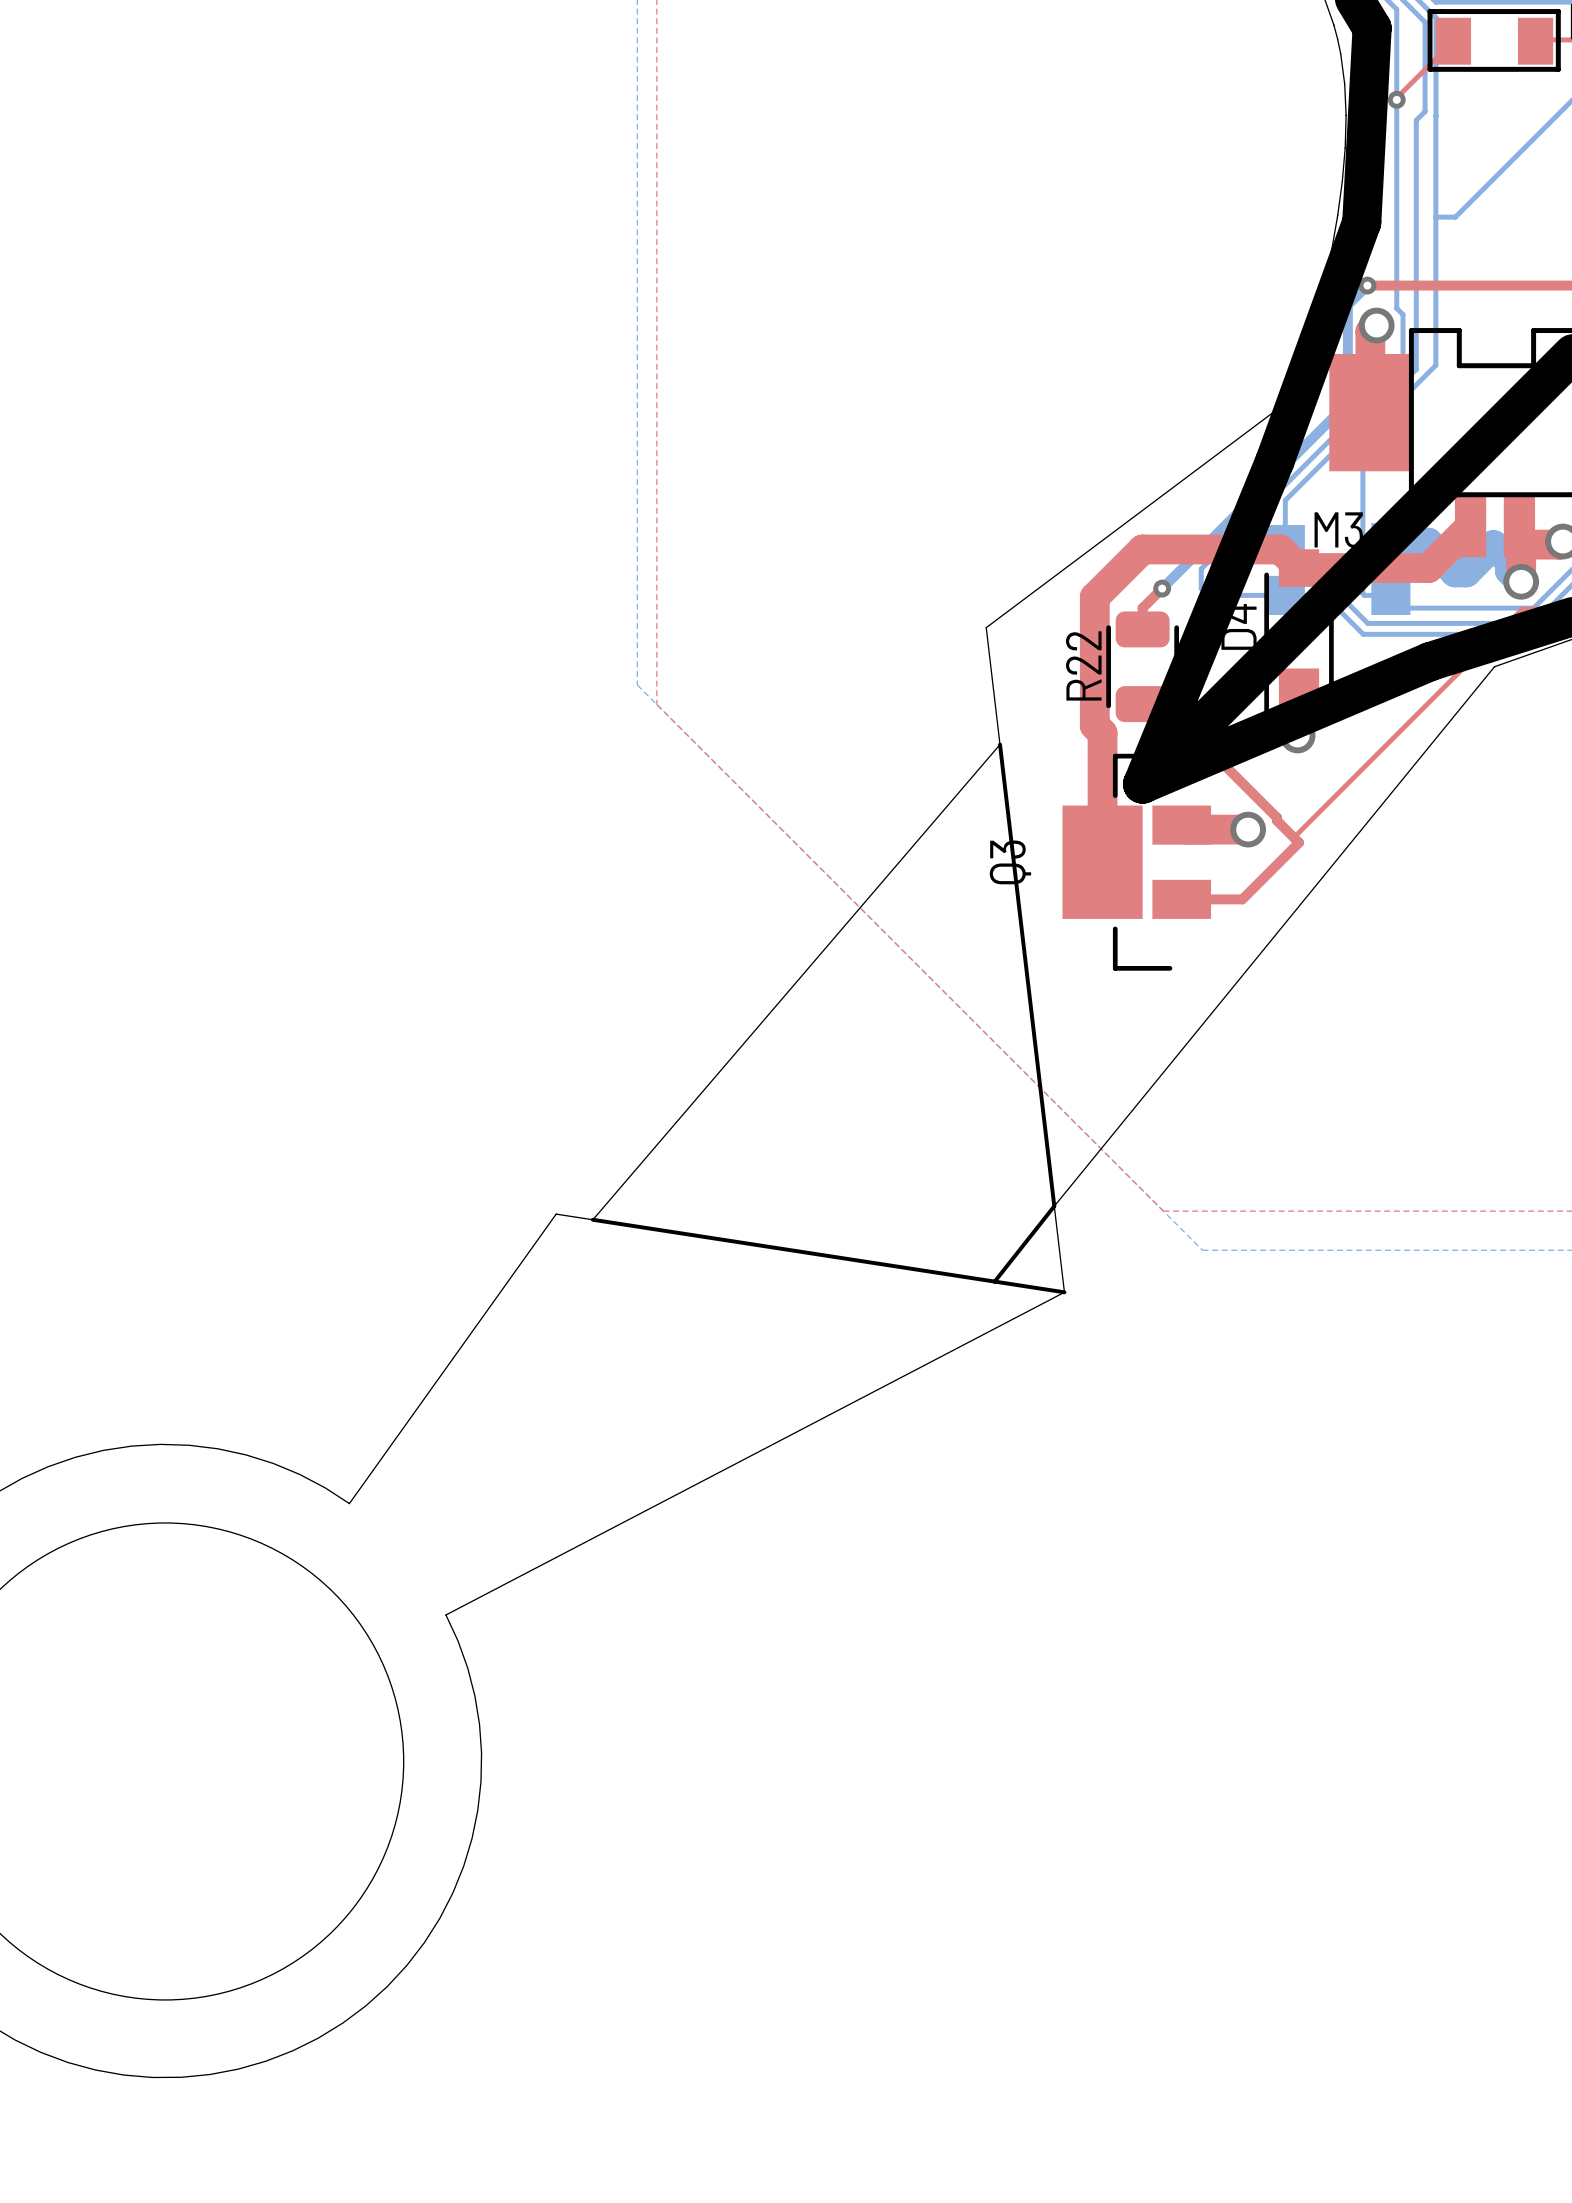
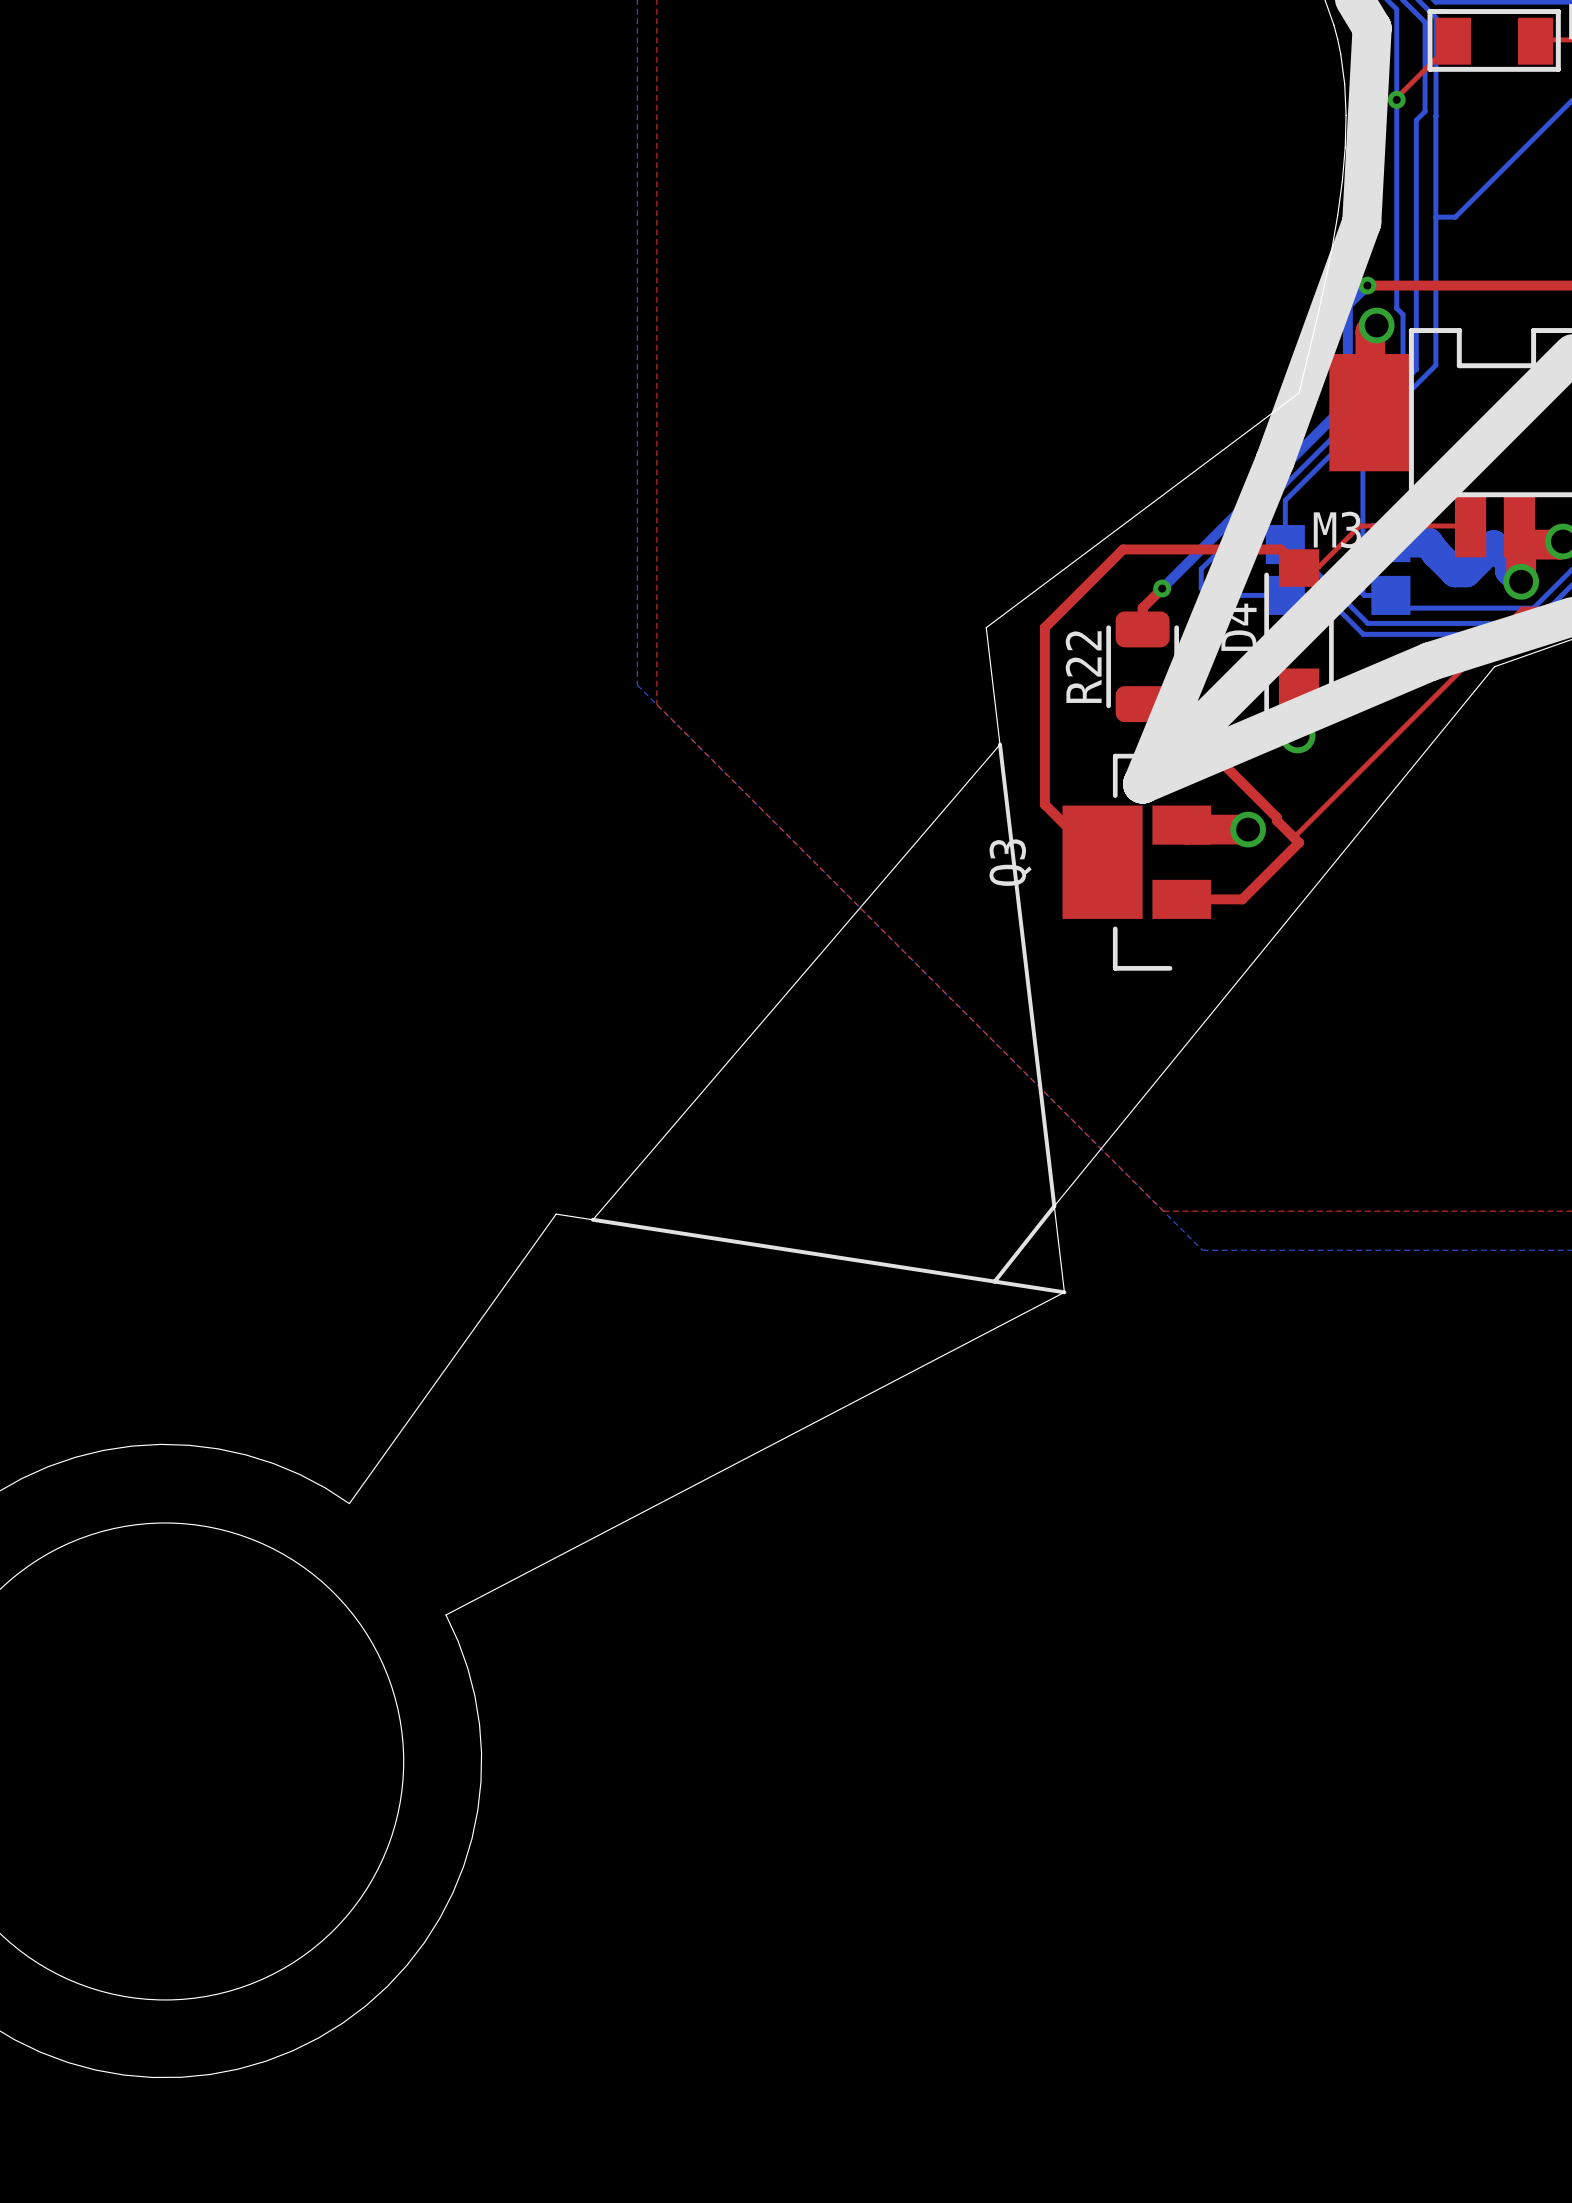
top track: (1470, 526) (1428, 568) (1299, 568) -> (1470, 526) (1359, 526) (1318, 566) (1299, 568)
top track: (1142, 549) (1094, 597) (1094, 725) (1102, 733) (1102, 862) -> (1142, 549) (1123, 549) (1044, 627) (1044, 804) (1102, 862)
top track width: thick (1142, 549) (1280, 549) (1299, 568) -> thin (1142, 549) (1280, 549) (1299, 568)

